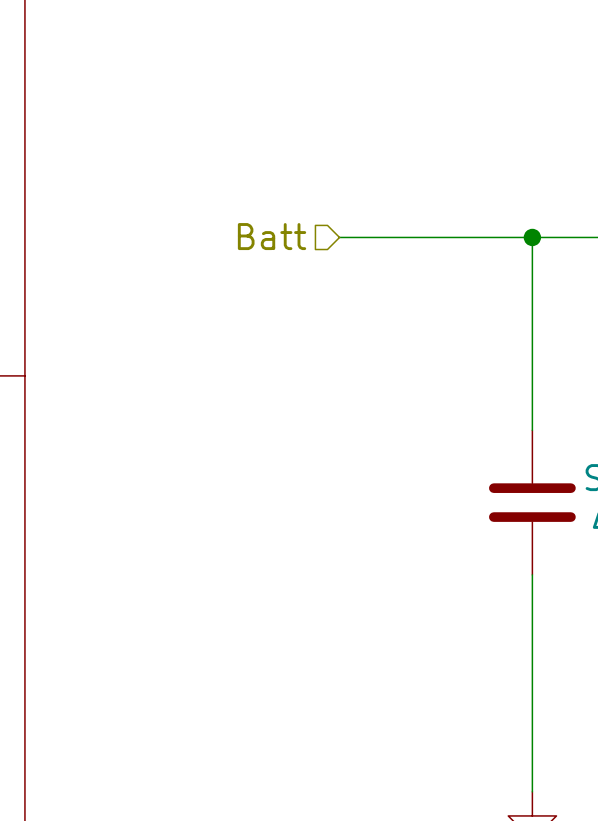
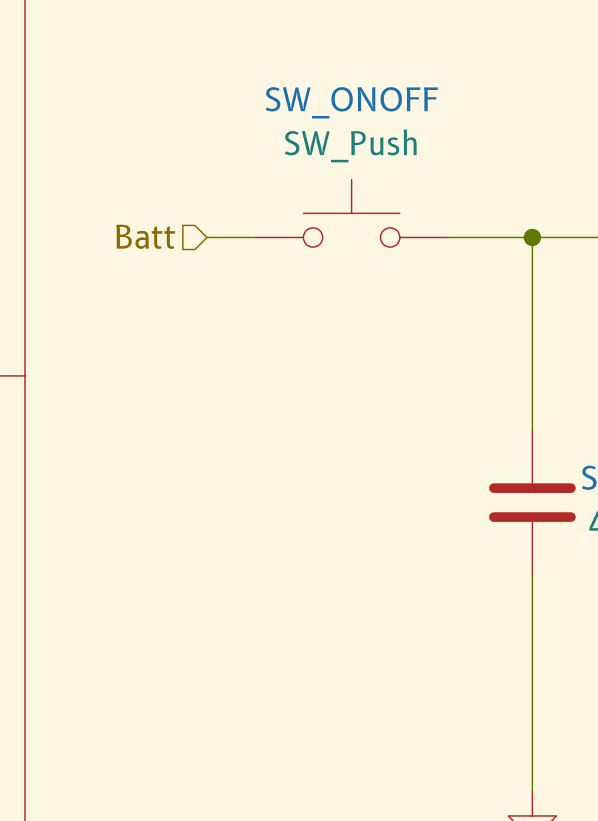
SW_ONOFF: none -> SW_Push (351, 213)
hierarchical label position: Batt (272, 236) -> Batt (145, 236)
wire: none -> (206, 237) (255, 237)
wire: (339, 237) (448, 237) -> none

